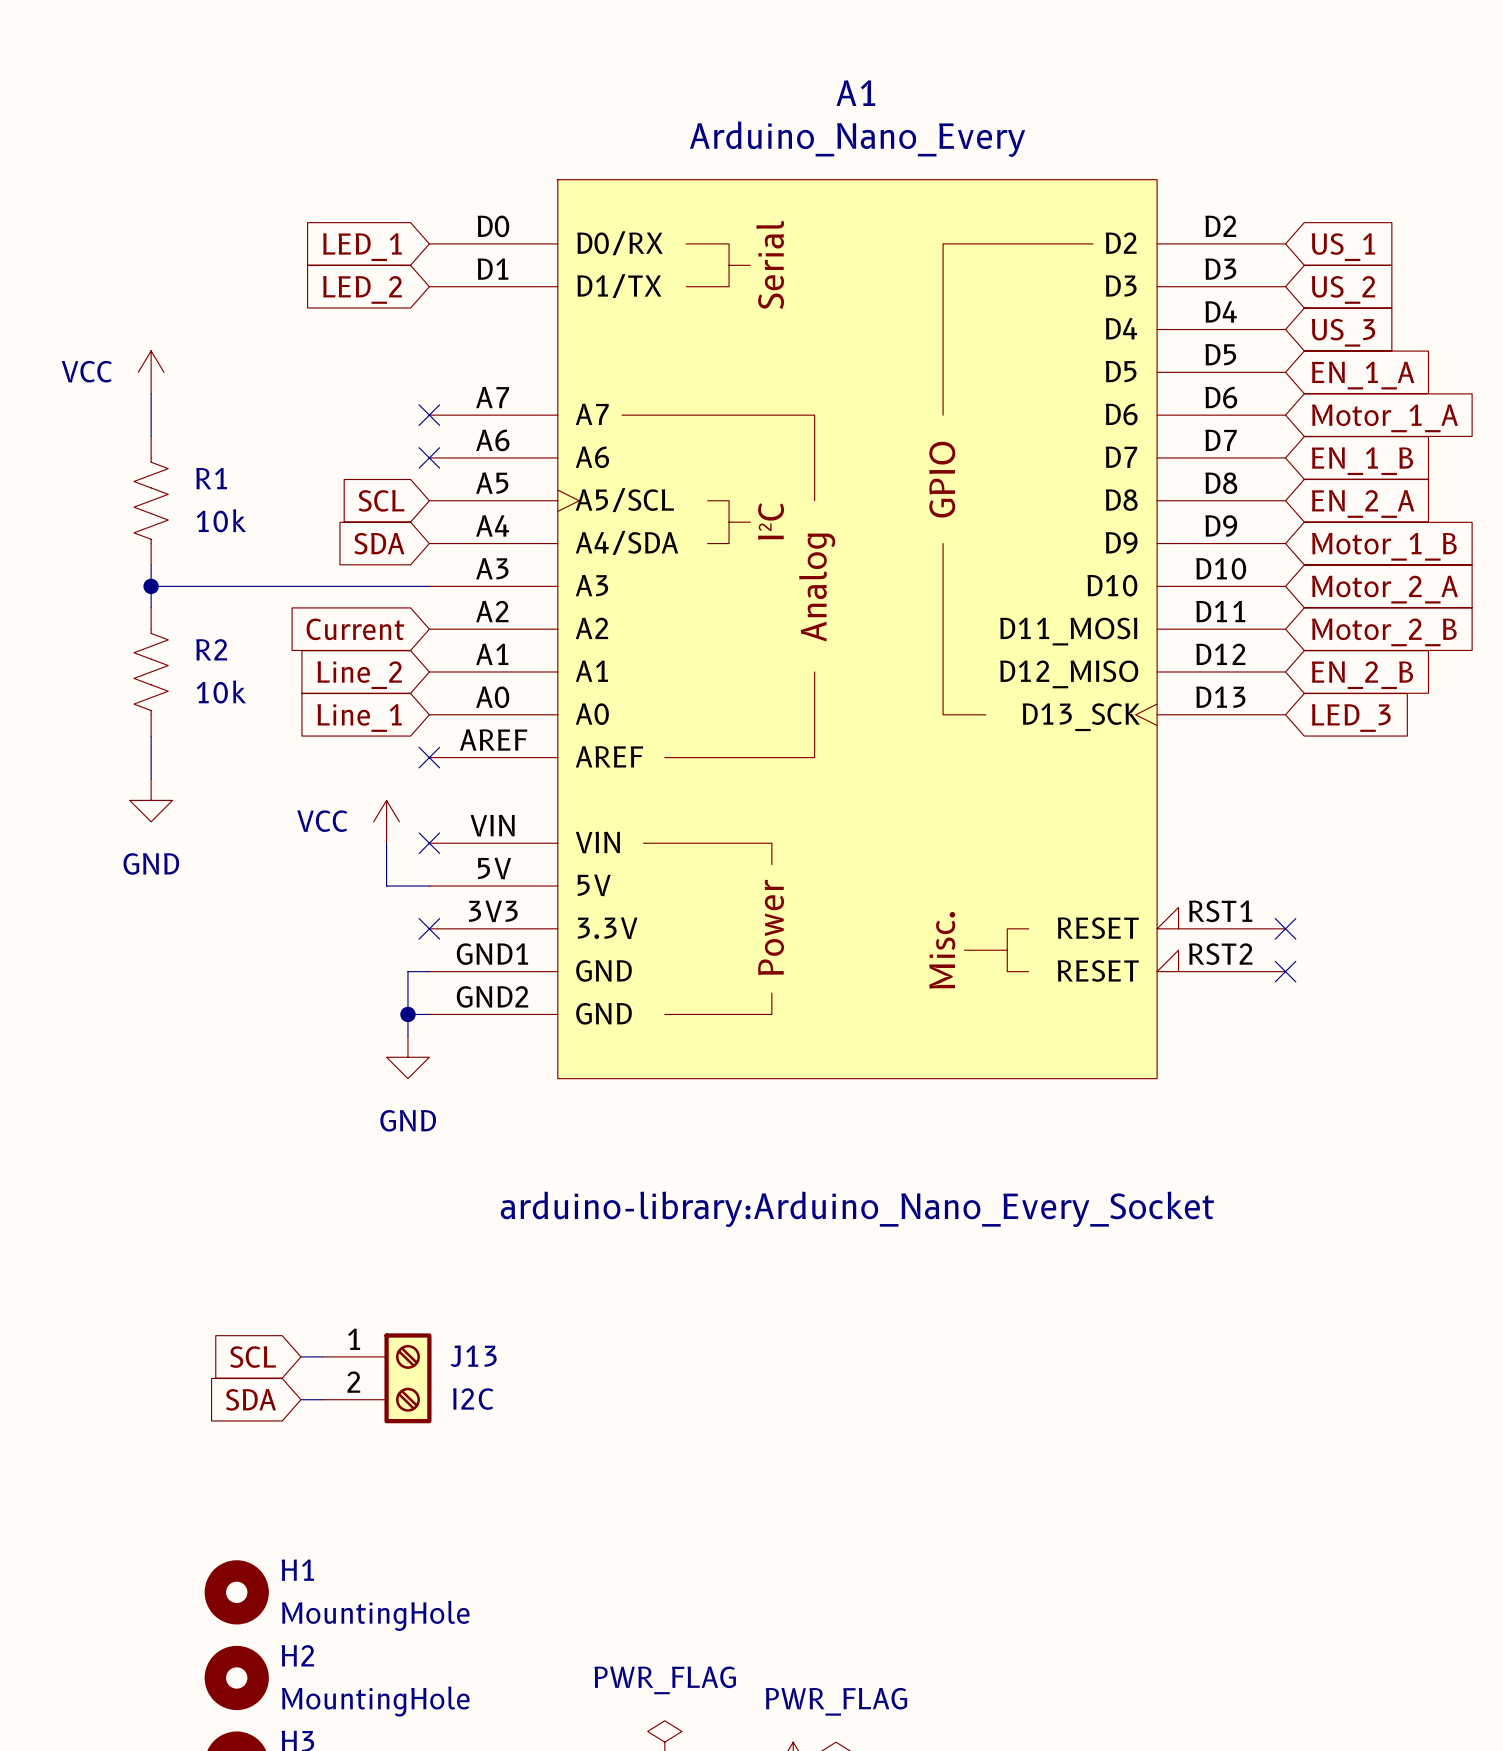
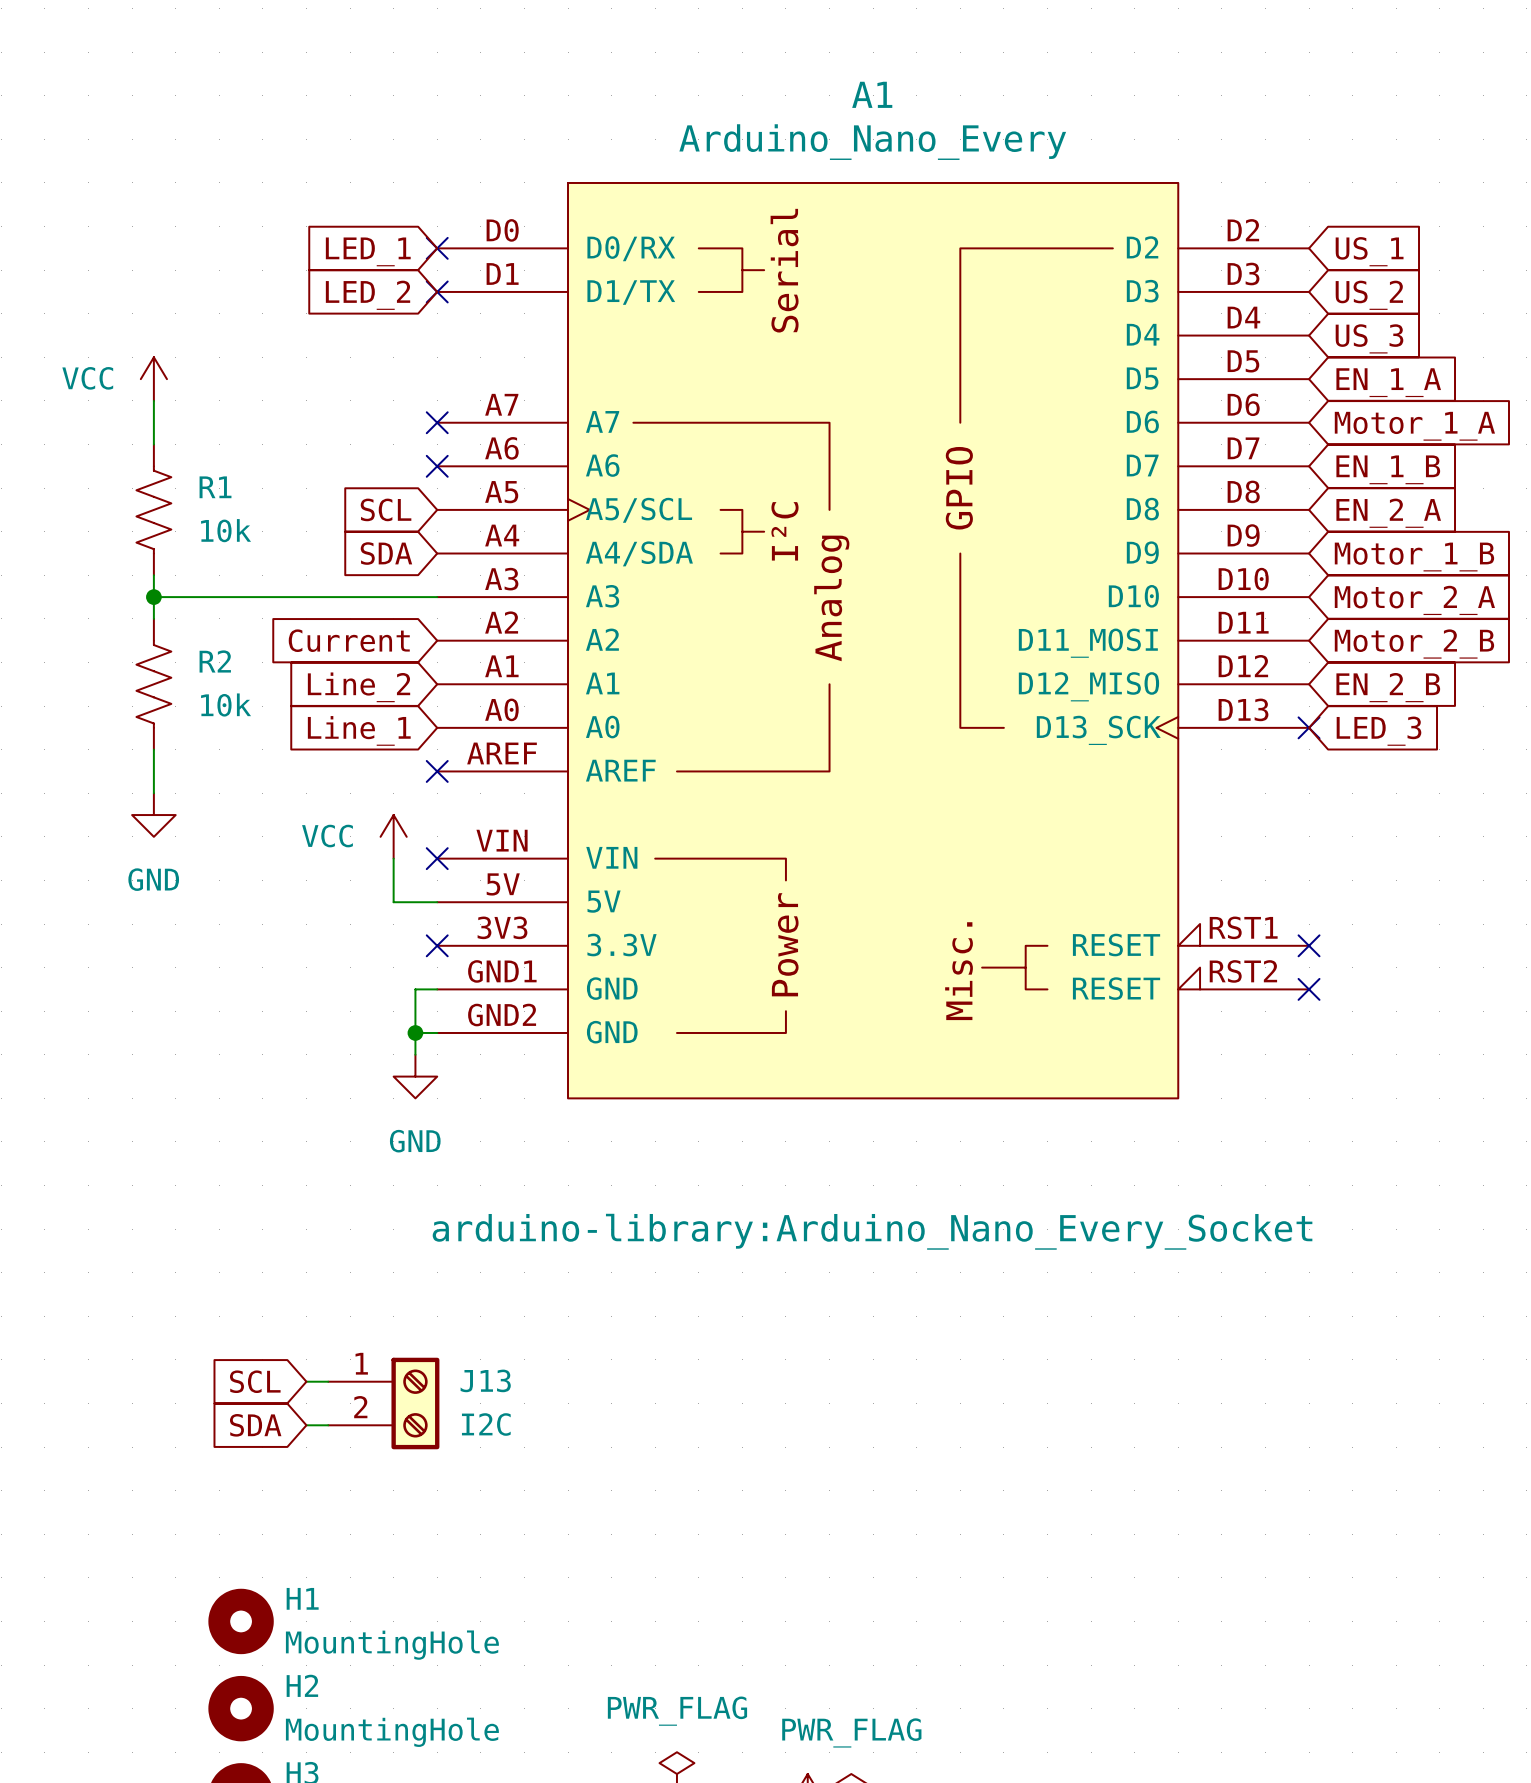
no-connect mark: none -> (437, 248)
no-connect mark: none -> (437, 291)
no-connect mark: none -> (1309, 727)

